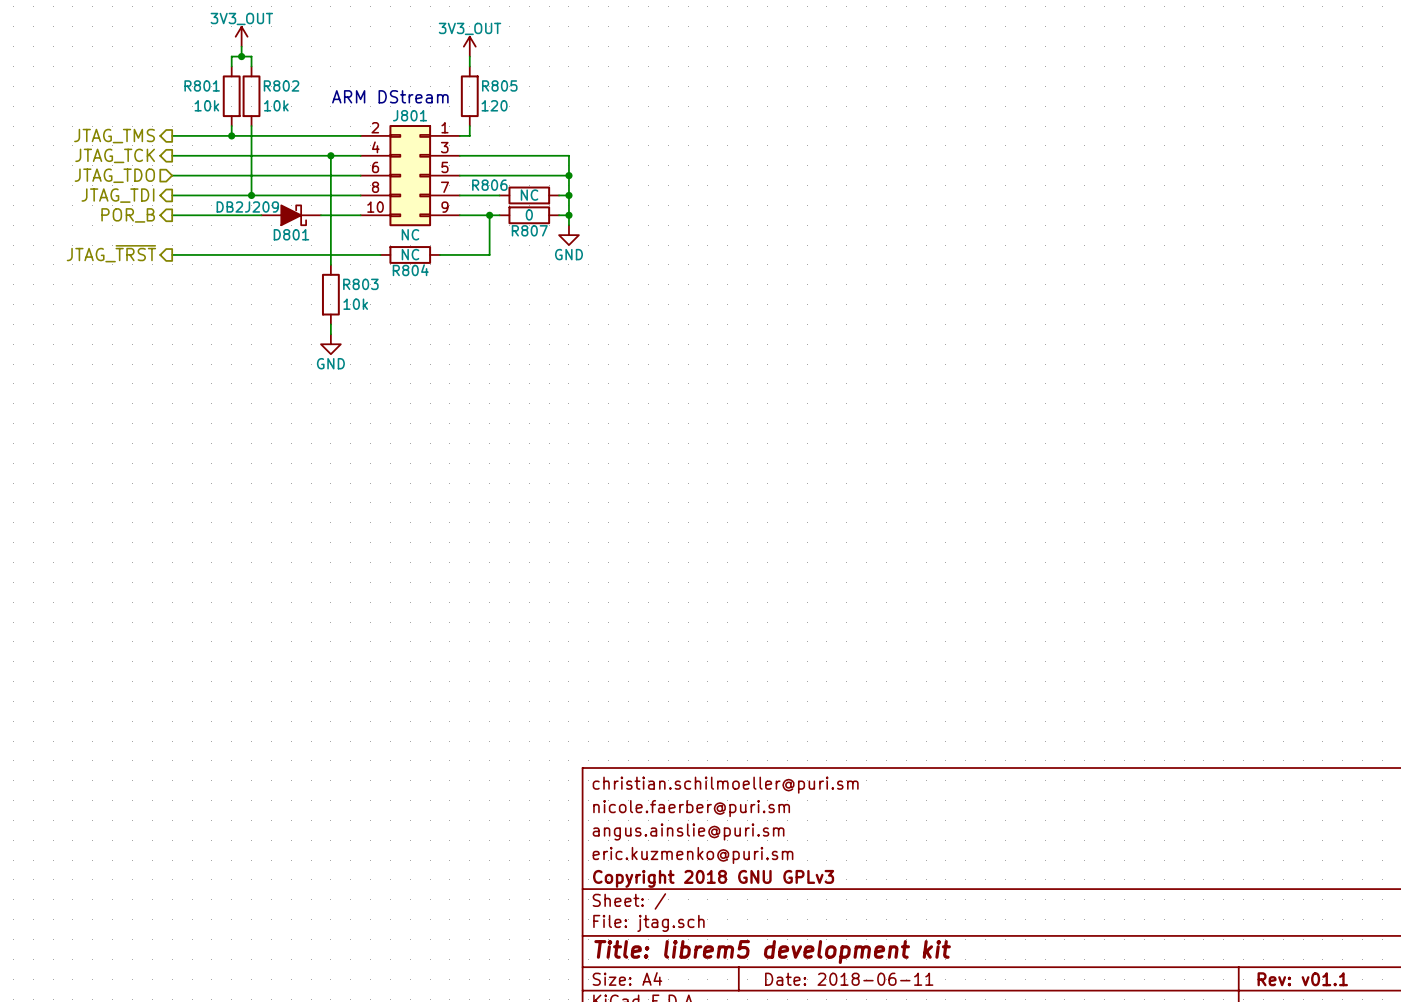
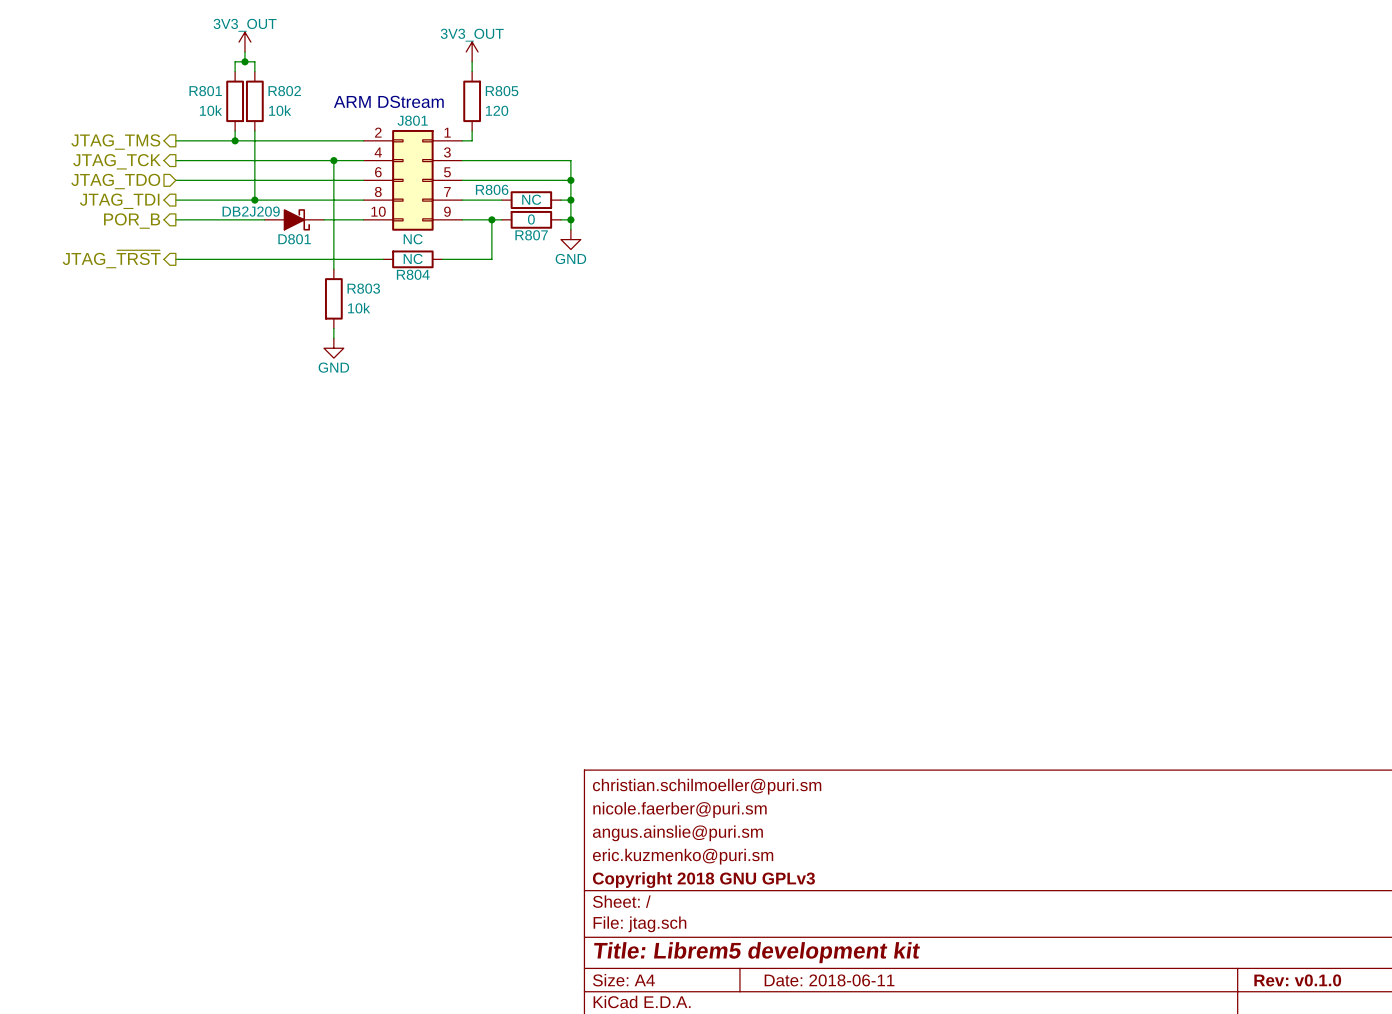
title block: Title: librem5 development kit (772, 952) -> Title: Librem5 development kit (757, 952)
title block: Rev: v01.1 (1302, 979) -> Rev: v0.1.0 (1297, 980)

